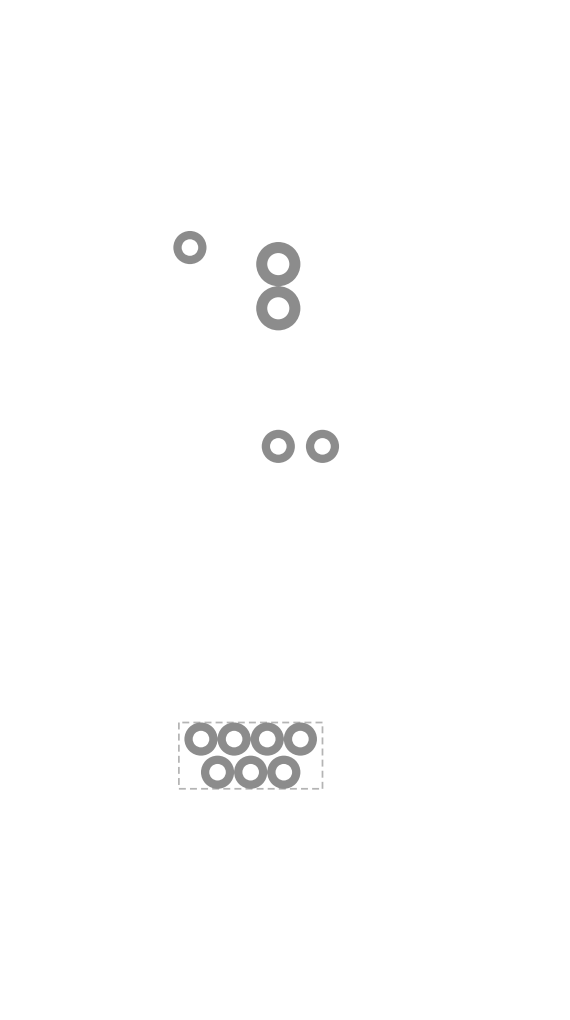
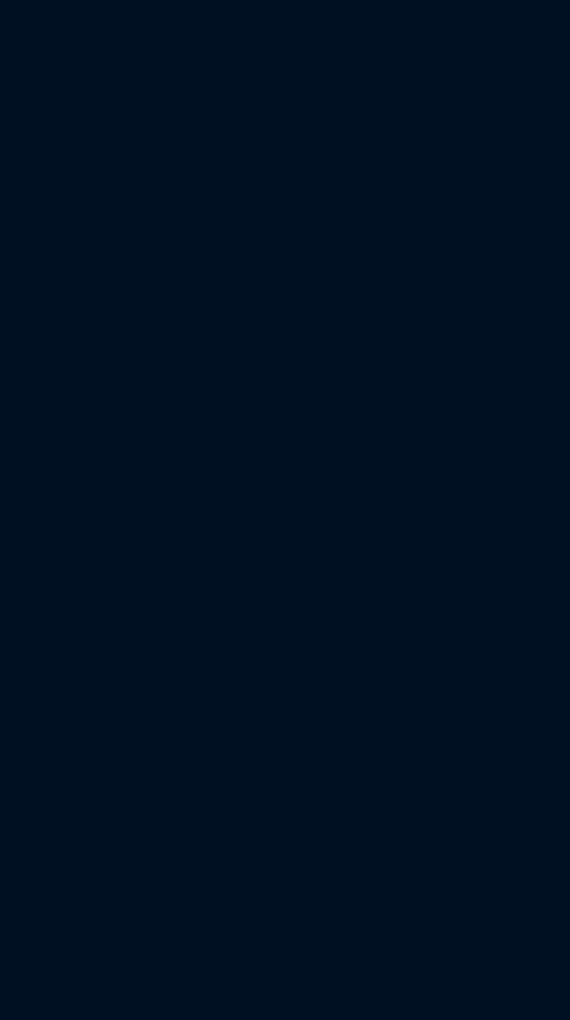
via: (189, 247) -> none
via: (278, 264) -> none
via: (278, 308) -> none
via: (278, 446) -> none
via: (322, 446) -> none
zone outline: (322, 722) (178, 722) (178, 788) (322, 788) (322, 722) -> none
via: (200, 739) -> none
via: (234, 739) -> none
via: (267, 739) -> none
via: (300, 739) -> none
via: (217, 772) -> none
via: (250, 772) -> none
via: (283, 772) -> none

